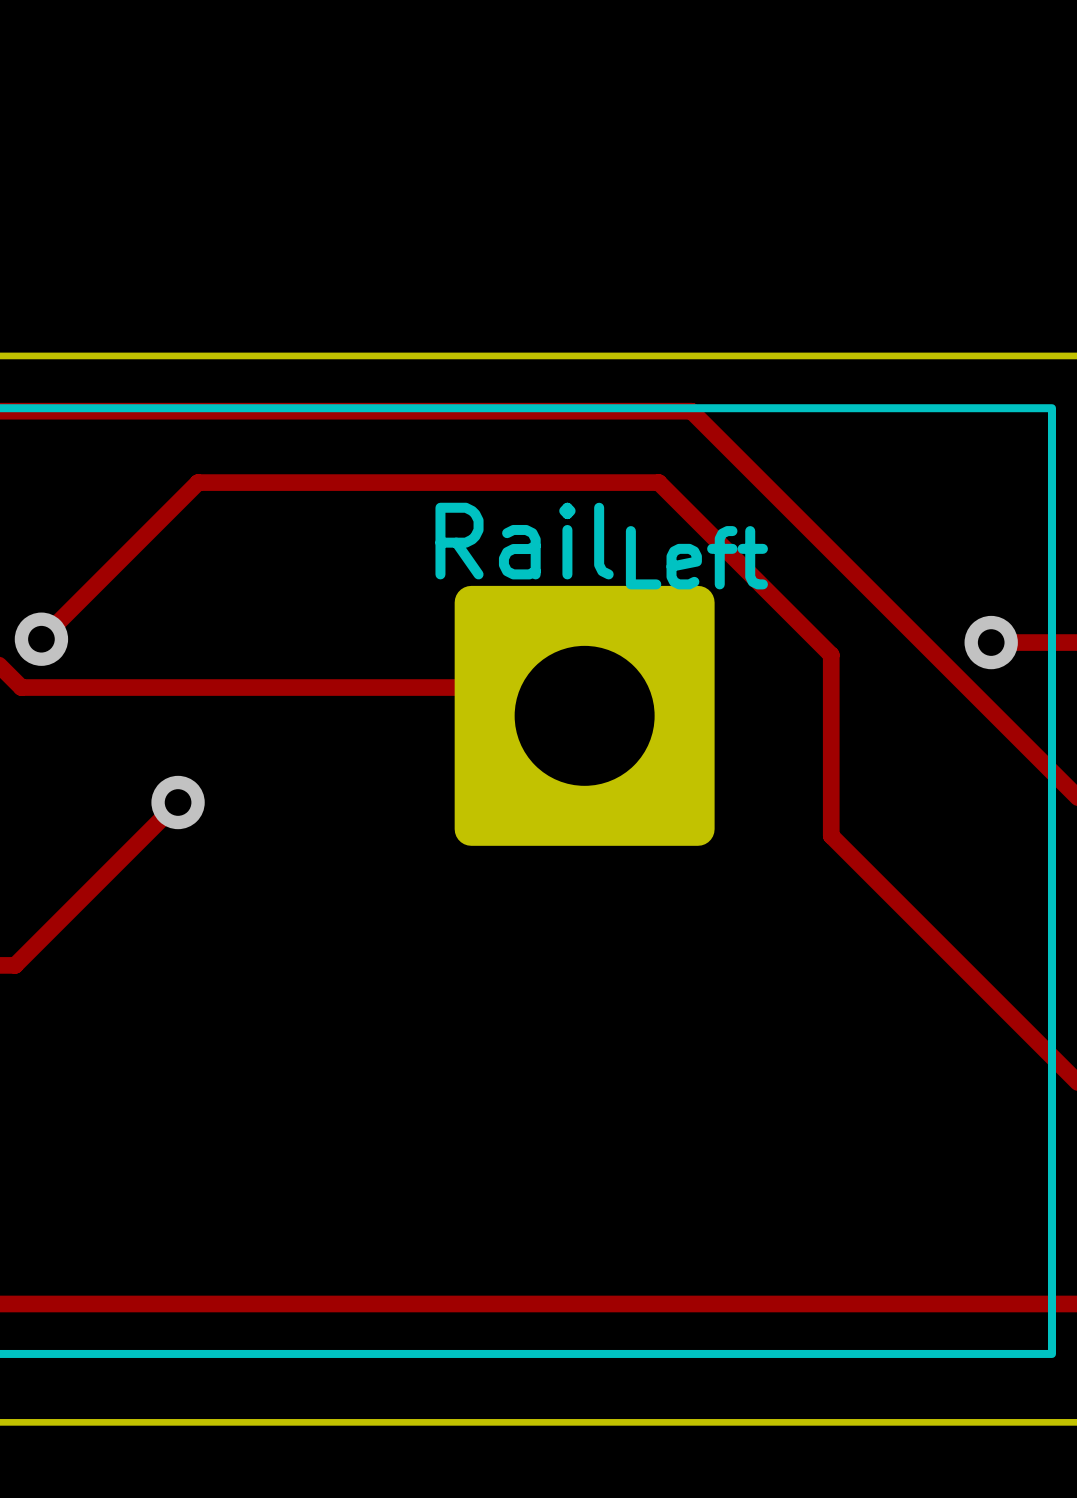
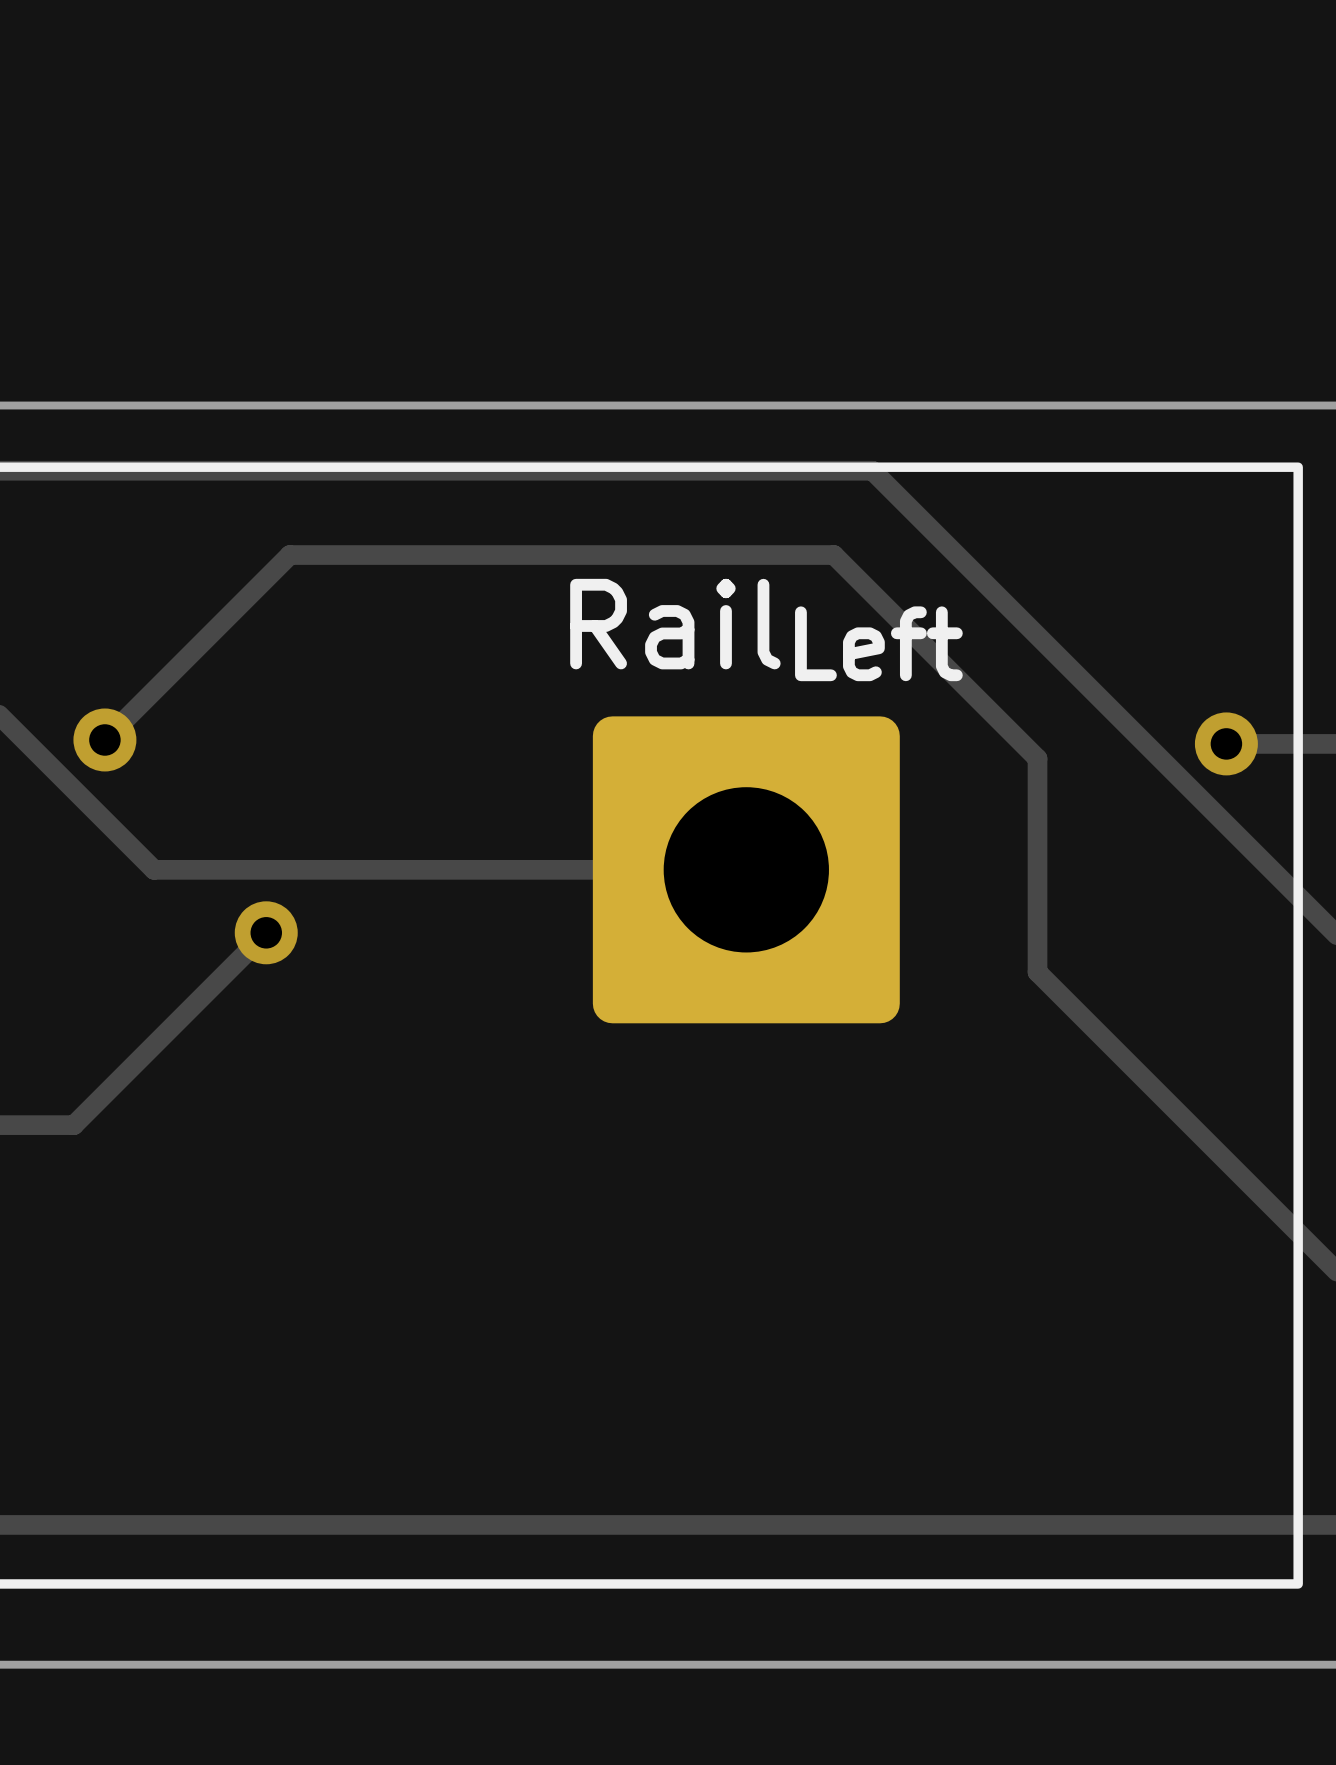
track: (21, 687) (556, 687) (584, 715) (551, 749) -> (81, 797) (154, 869) (746, 869)
part position: (584, 715) -> (746, 869)

